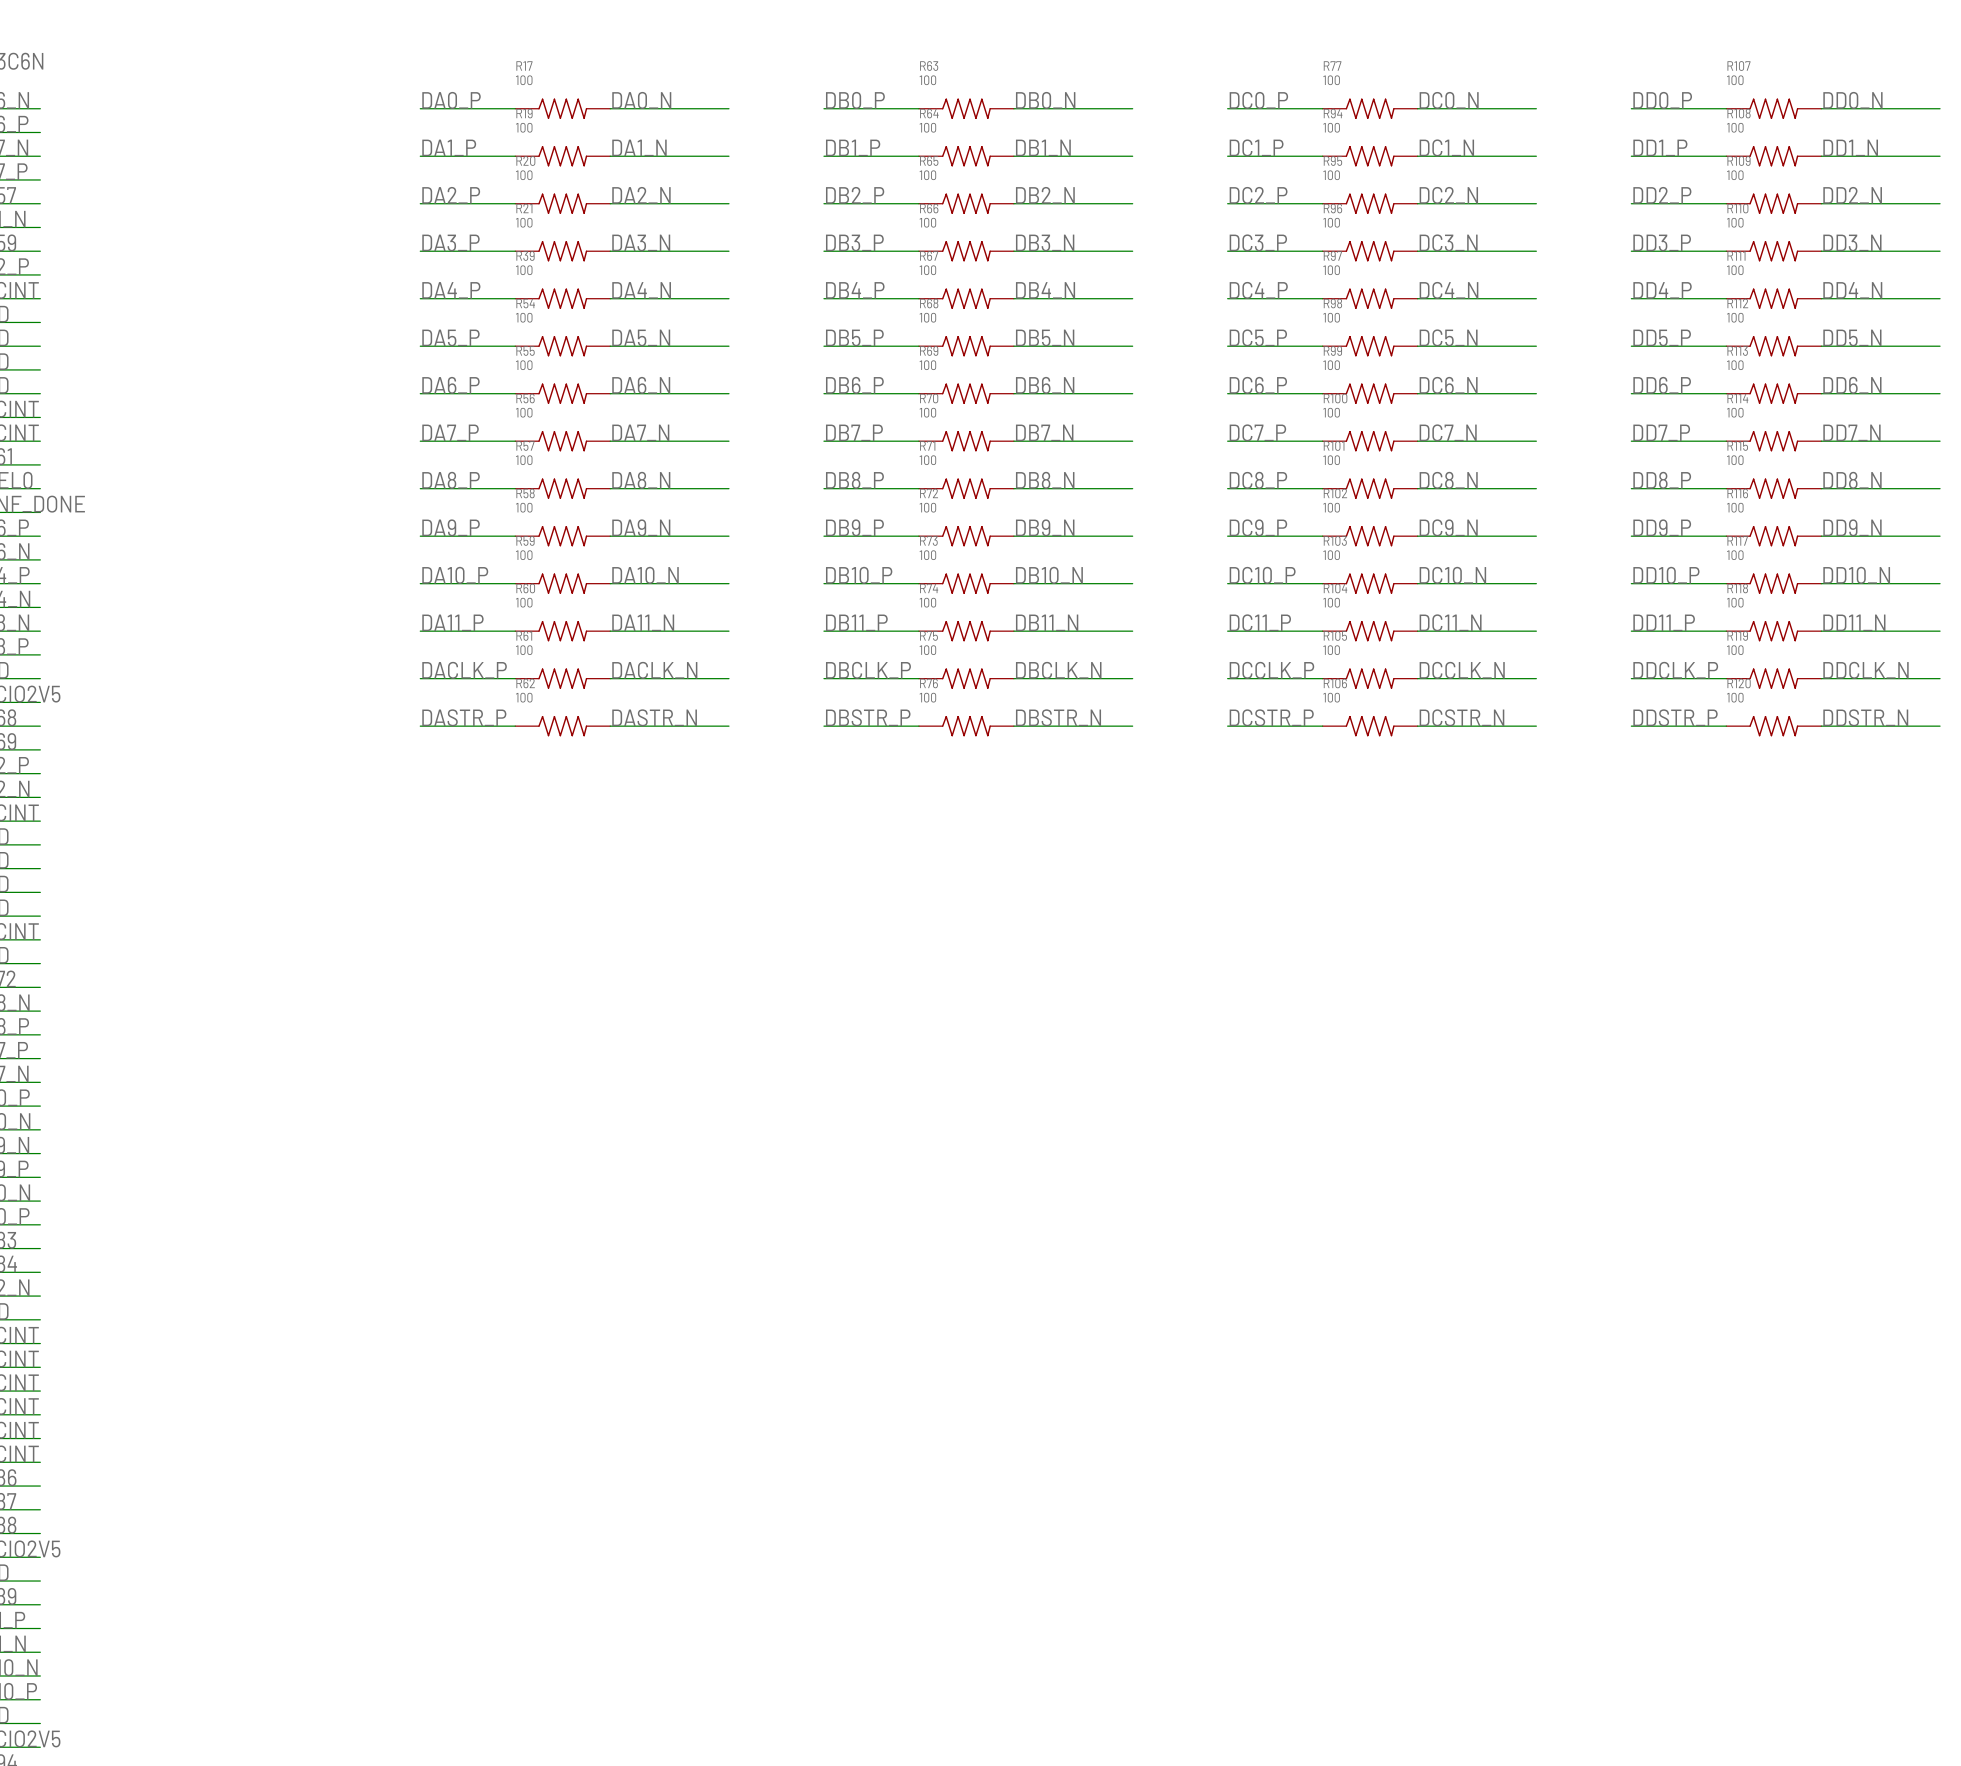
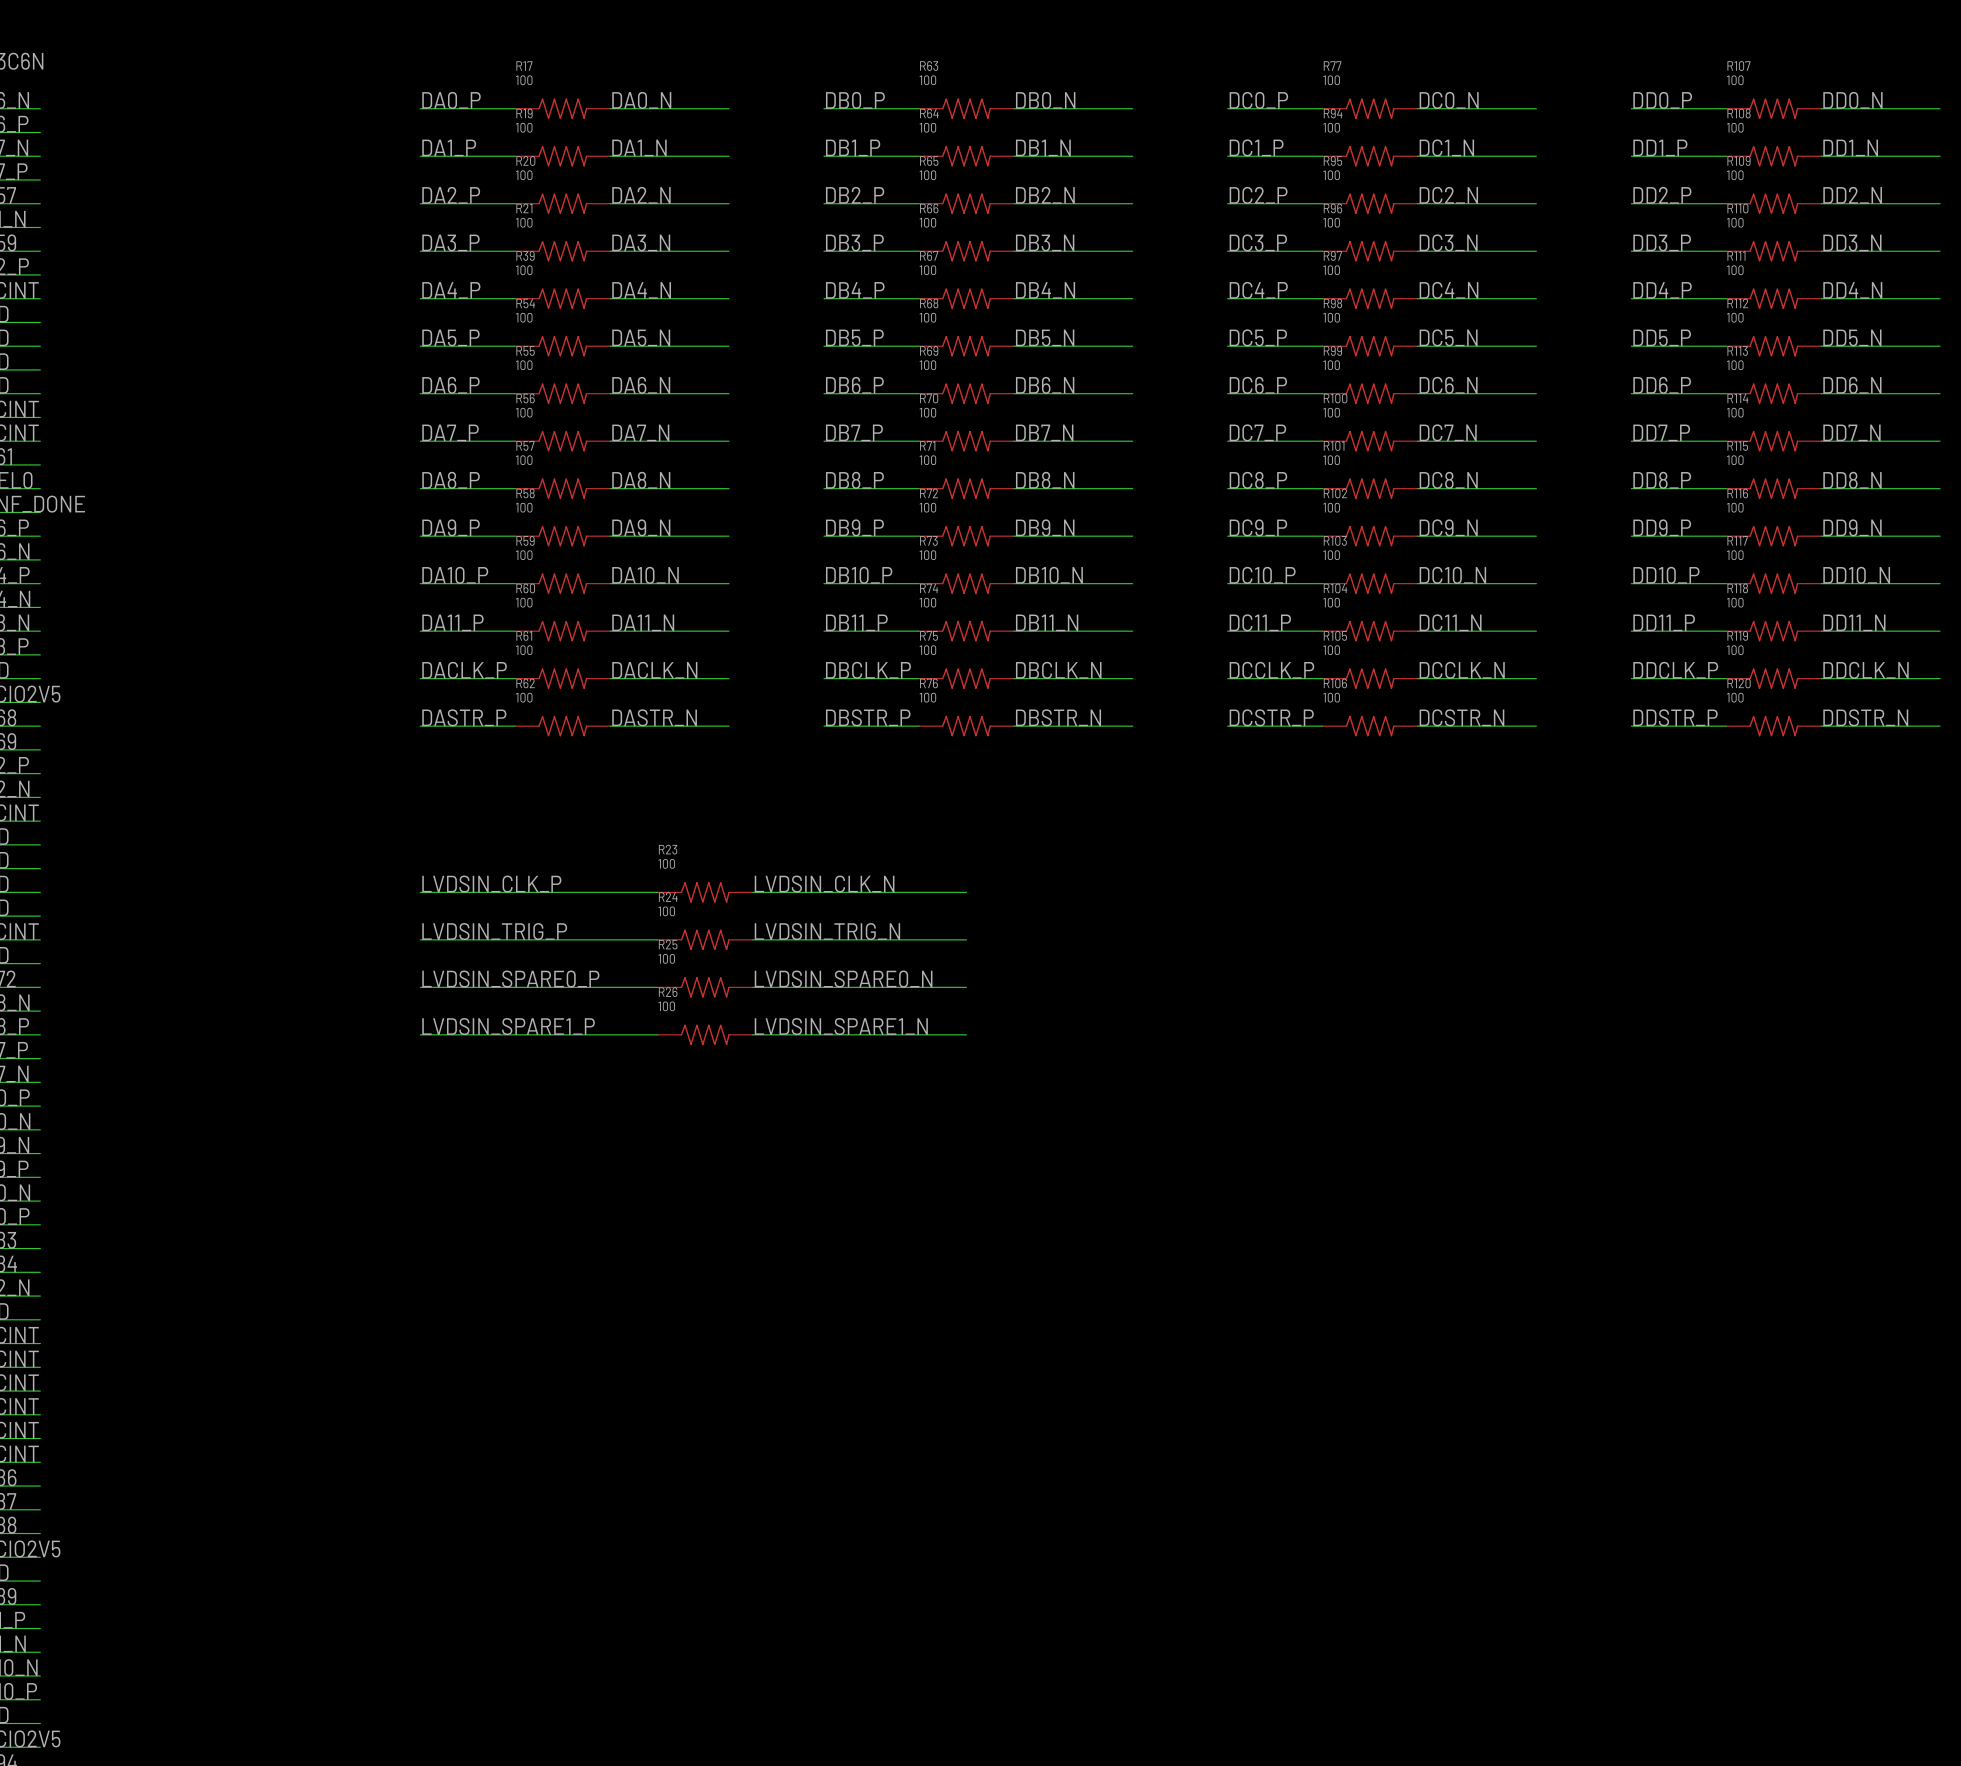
label: none -> LVDSIN_CLK_P (491, 884)
label: none -> LVDSIN_CLK_N (824, 884)
wire: none -> (420, 892) (657, 892)
R23: none -> 100 (705, 892)
wire: none -> (752, 892) (966, 892)
label: none -> LVDSIN_TRIG_P (494, 931)
label: none -> LVDSIN_TRIG_N (827, 931)
wire: none -> (420, 939) (657, 939)
R24: none -> 100 (705, 939)
wire: none -> (752, 939) (966, 939)
label: none -> LVDSIN_SPARE0_P (510, 979)
label: none -> LVDSIN_SPARE0_N (843, 979)
wire: none -> (420, 987) (657, 987)
R25: none -> 100 (705, 987)
wire: none -> (752, 987) (966, 987)
label: none -> LVDSIN_SPARE1_P (508, 1026)
label: none -> LVDSIN_SPARE1_N (841, 1026)
wire: none -> (420, 1034) (657, 1034)
R26: none -> 100 (705, 1034)
wire: none -> (752, 1034) (966, 1034)

